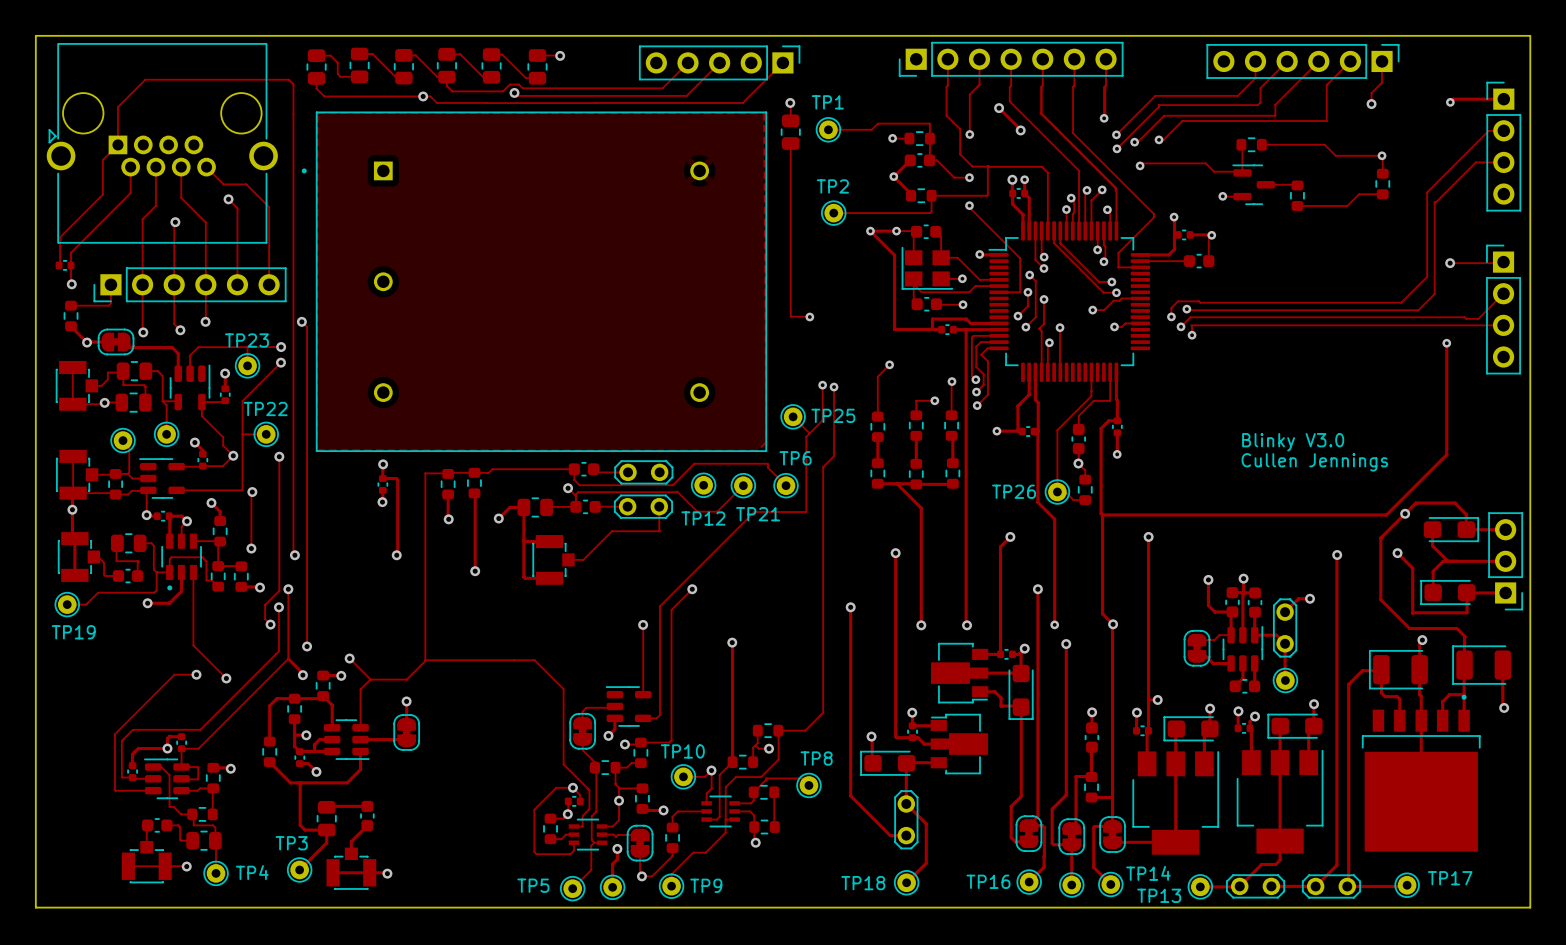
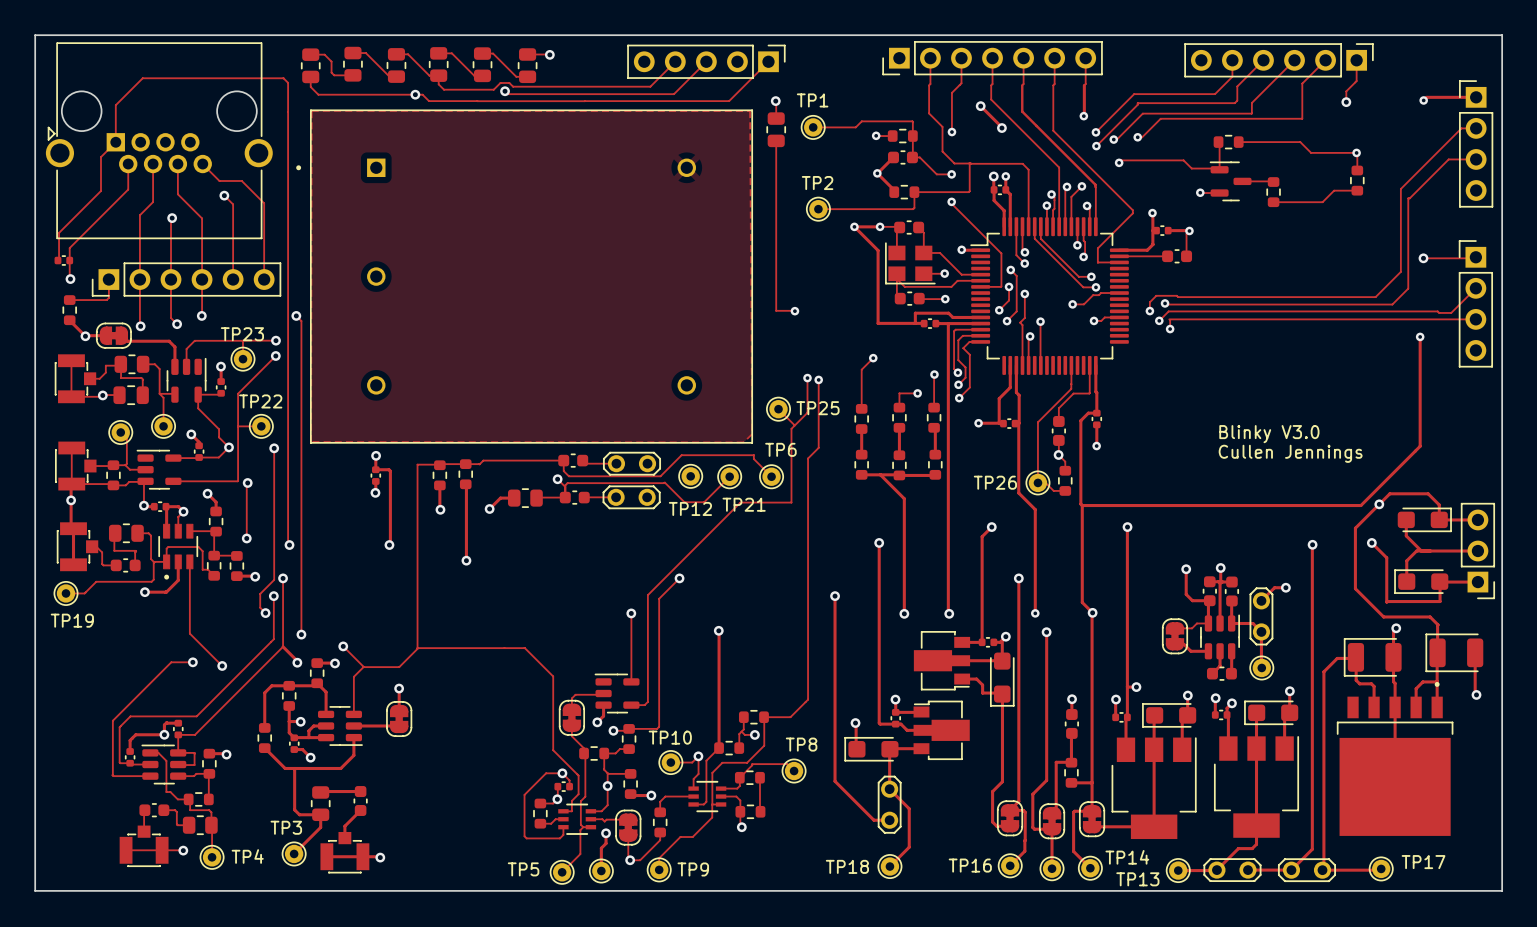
track: (659, 506) (659, 531) (611, 531) (583, 560) (568, 559) -> none
track: (523, 507) (523, 577) (549, 578) -> none
track: (523, 540) (549, 541) -> none
part: (553, 559) -> none

